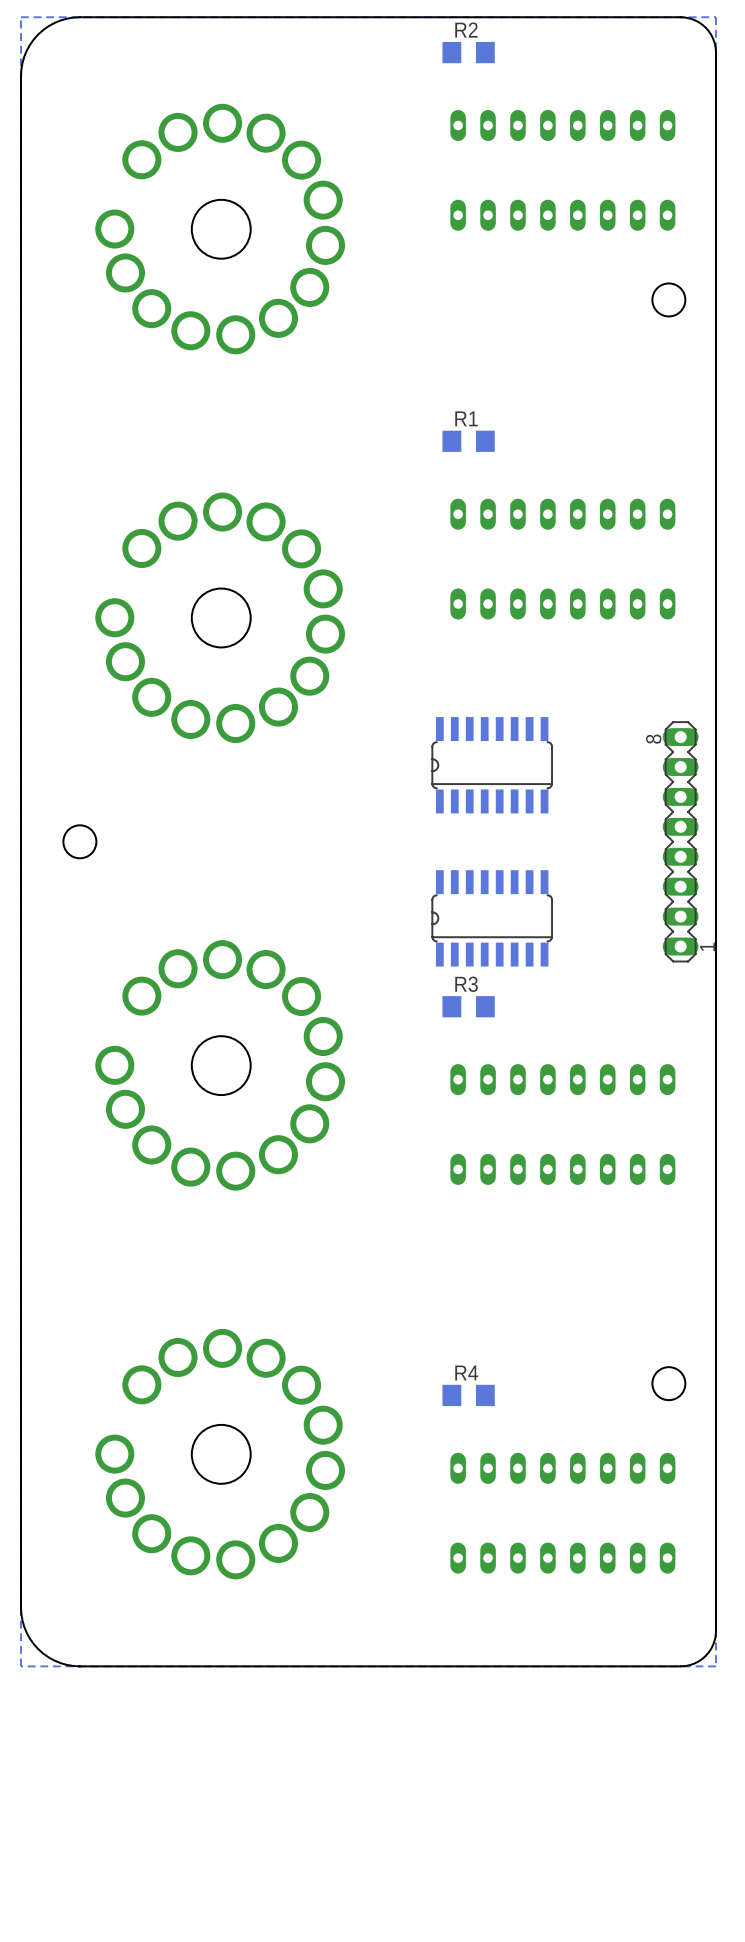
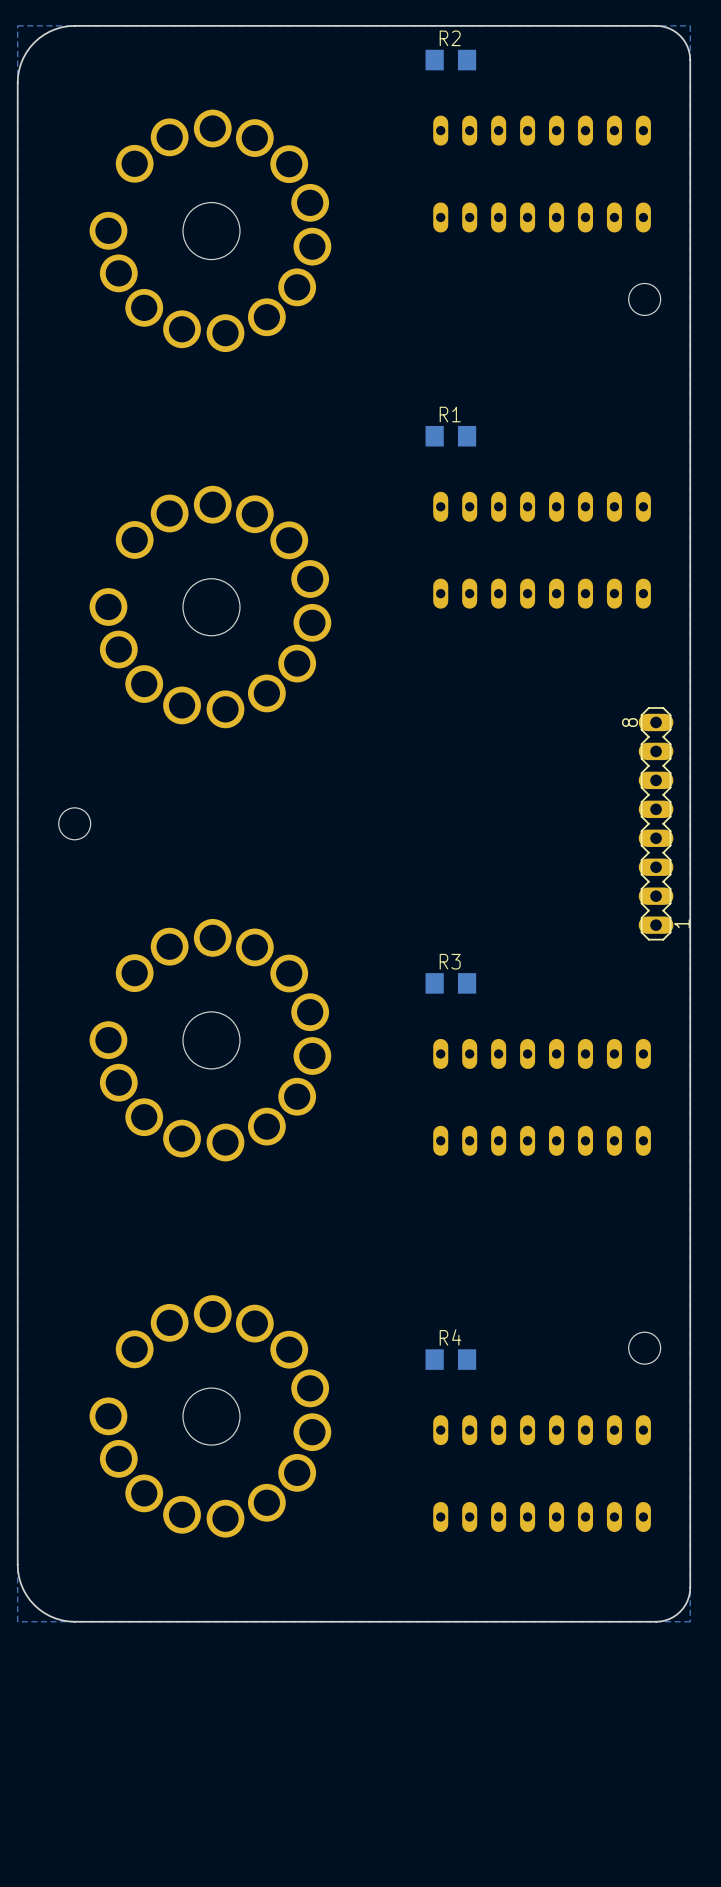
part: (492, 765) -> none
part: (492, 918) -> none

